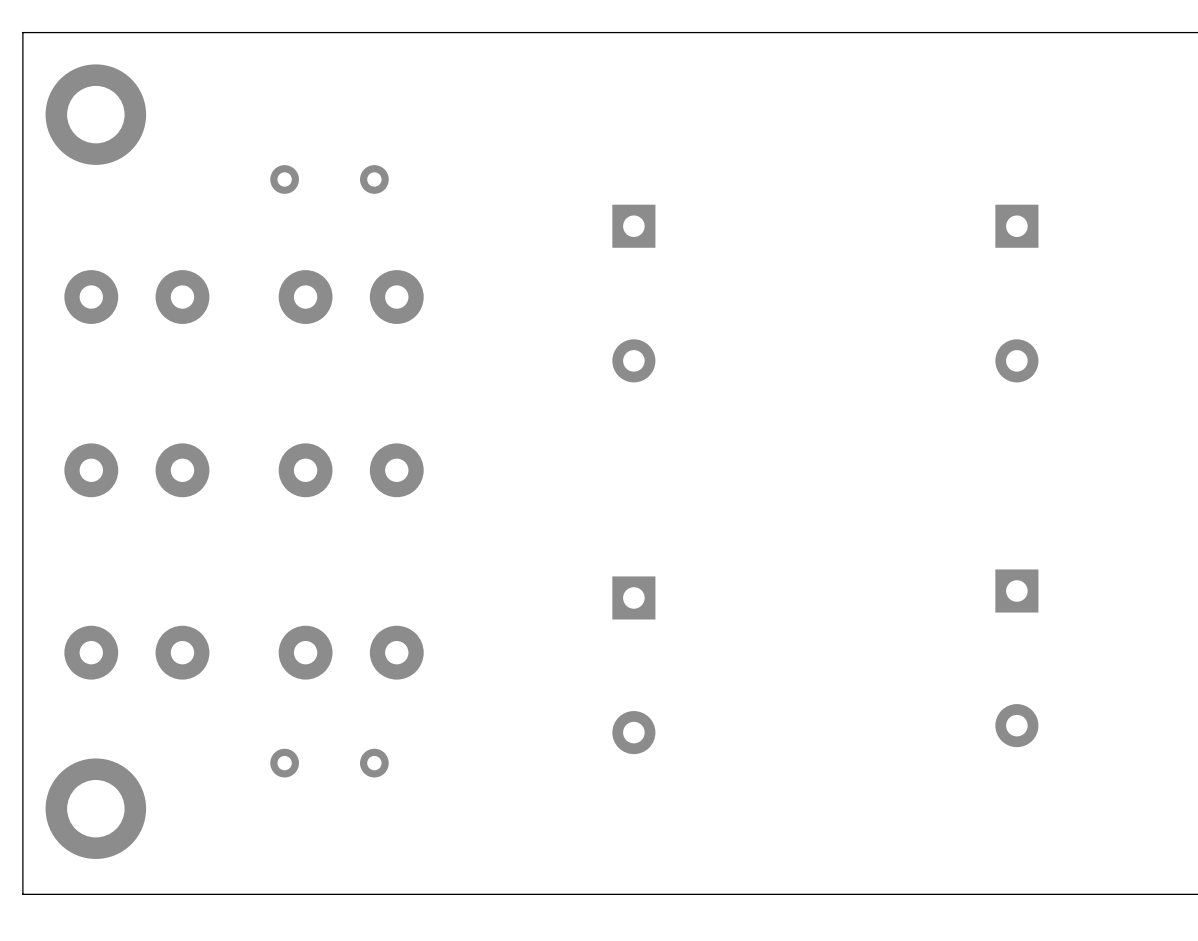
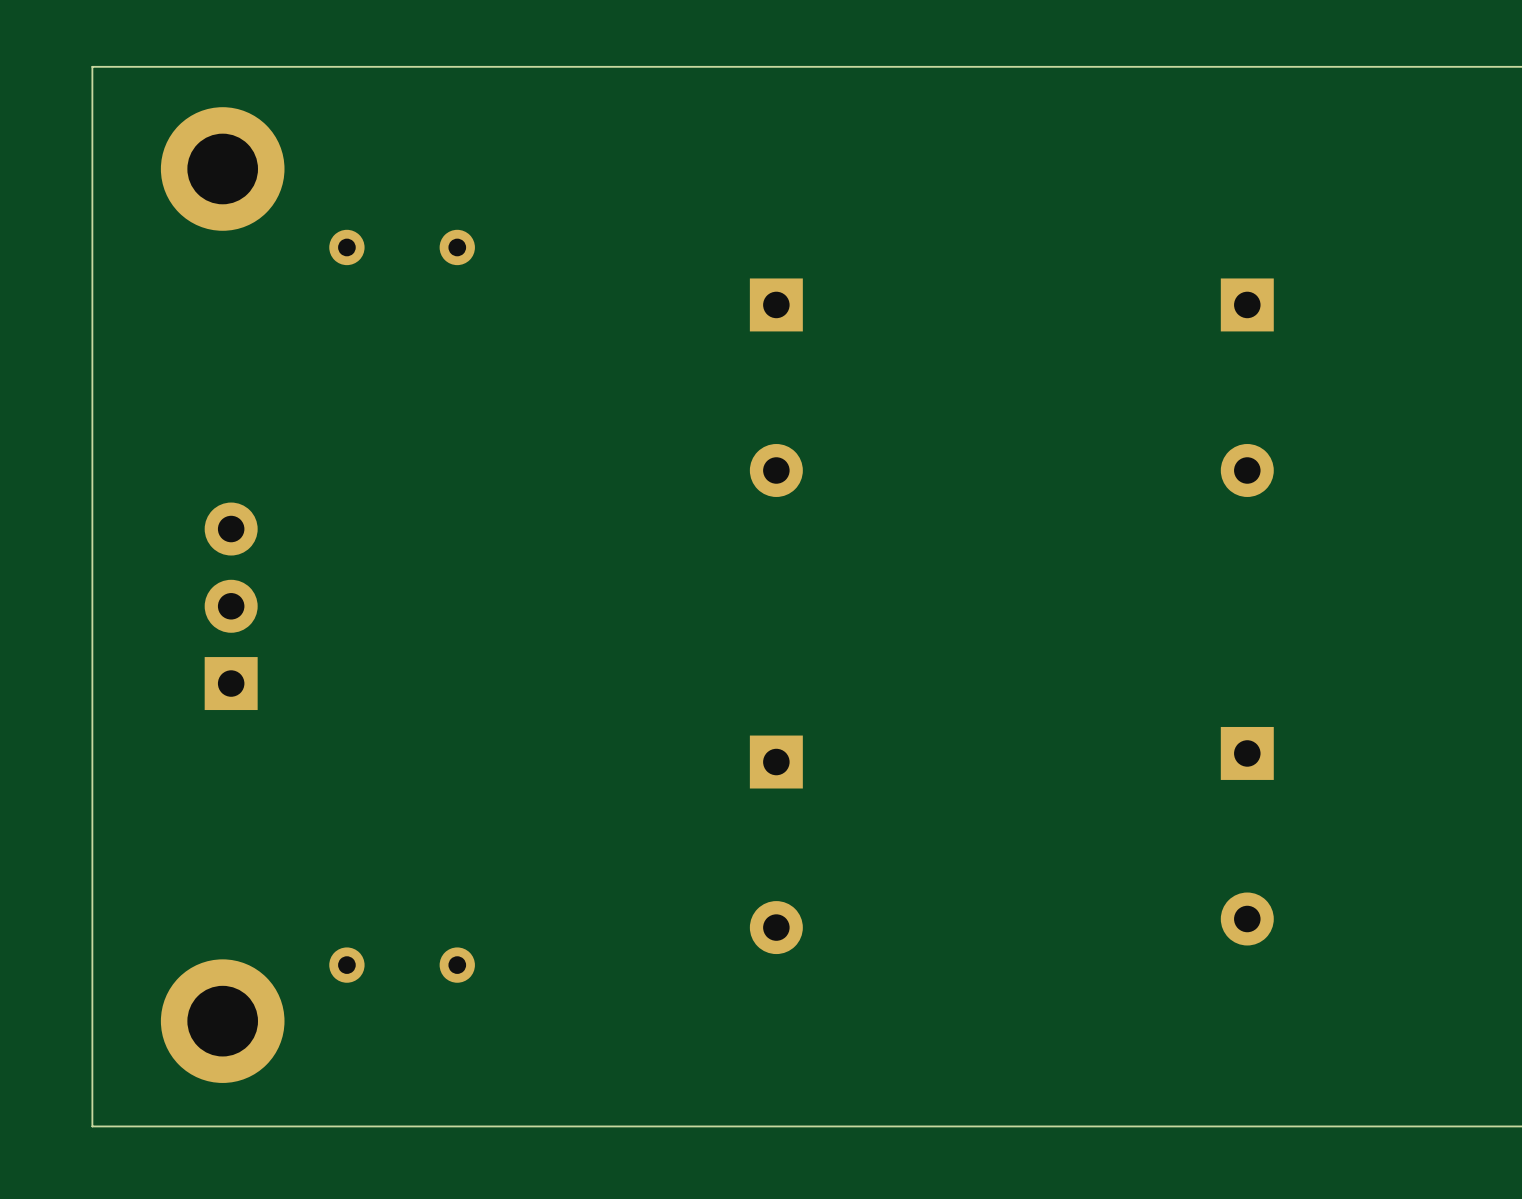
board edge: (77, 32) (22, 32) (22, 894) (77, 894) -> (92, 66) (92, 1126)
part position: (95, 114) -> (222, 168)
part: (136, 297) -> none
part: (351, 297) -> none
part: (136, 470) -> none
part: (351, 470) -> none
part: none -> (231, 606)
part: (136, 652) -> none
part: (351, 652) -> none
part position: (95, 808) -> (222, 1021)

